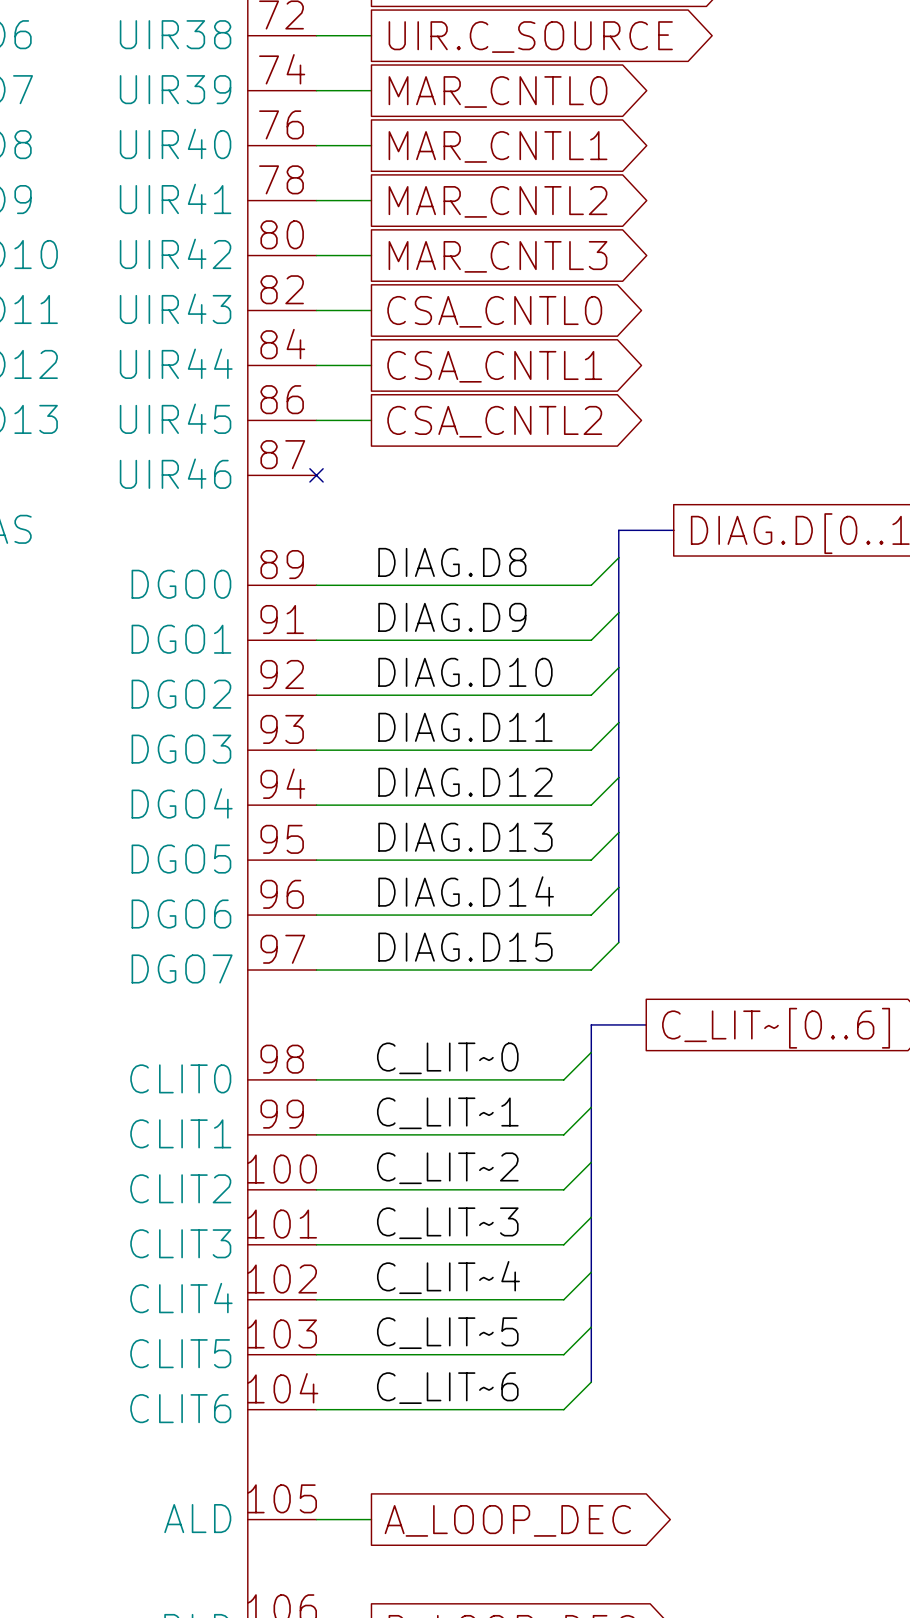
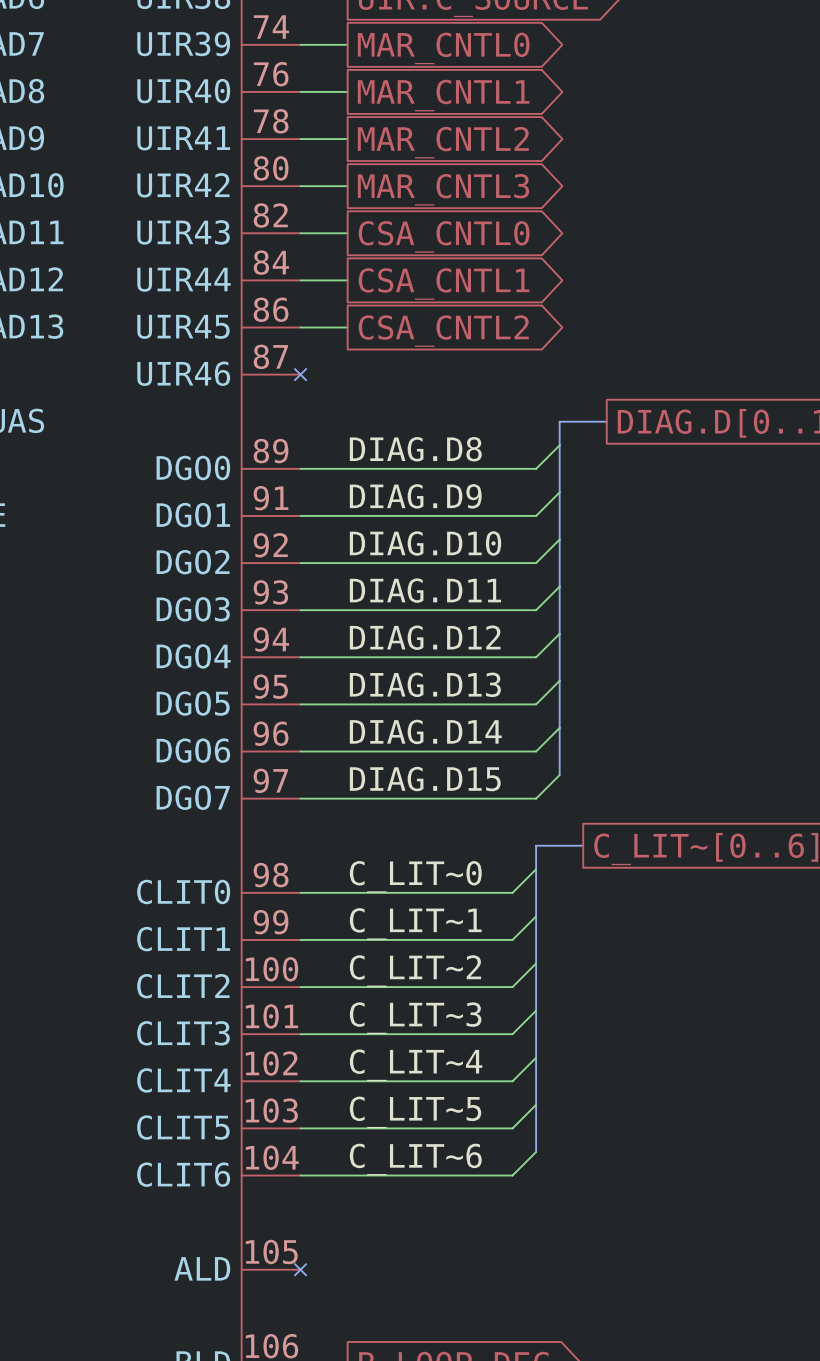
wire: (316, 1519) (371, 1519) -> none
no-connect mark: none -> (300, 1269)
global label: A_LOOP_DEC (507, 1520) -> none

